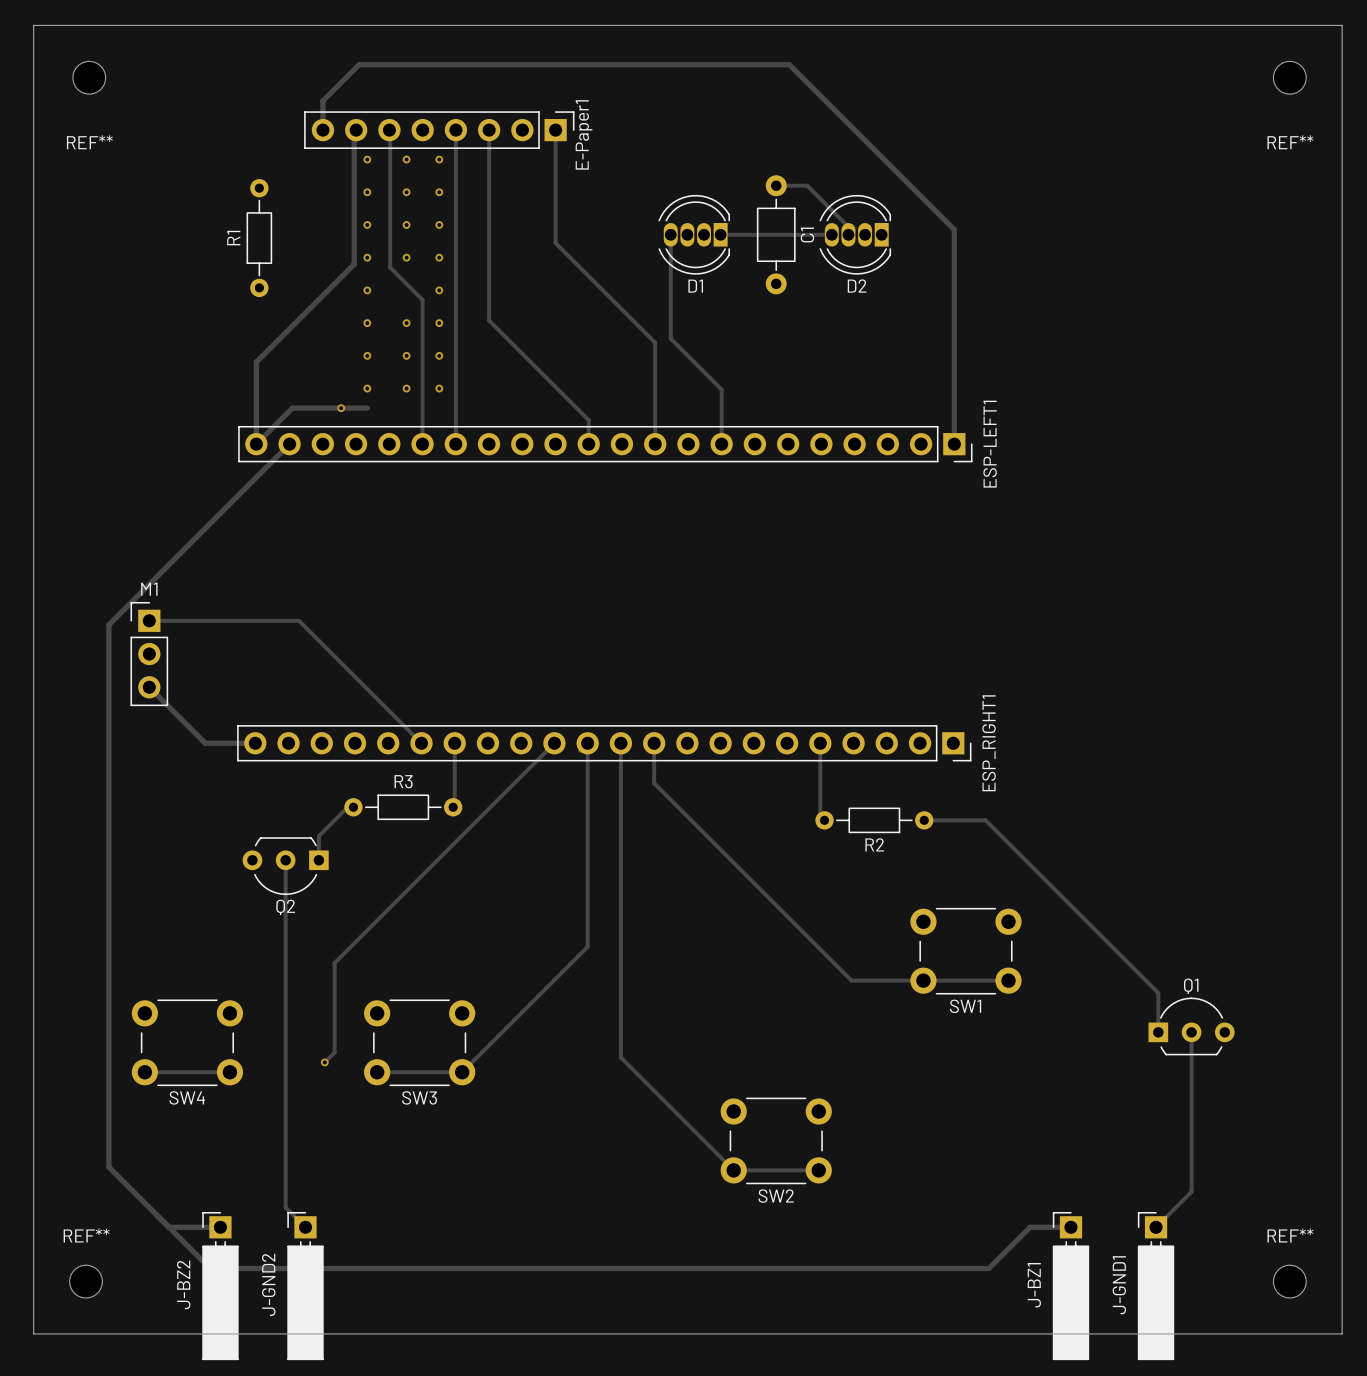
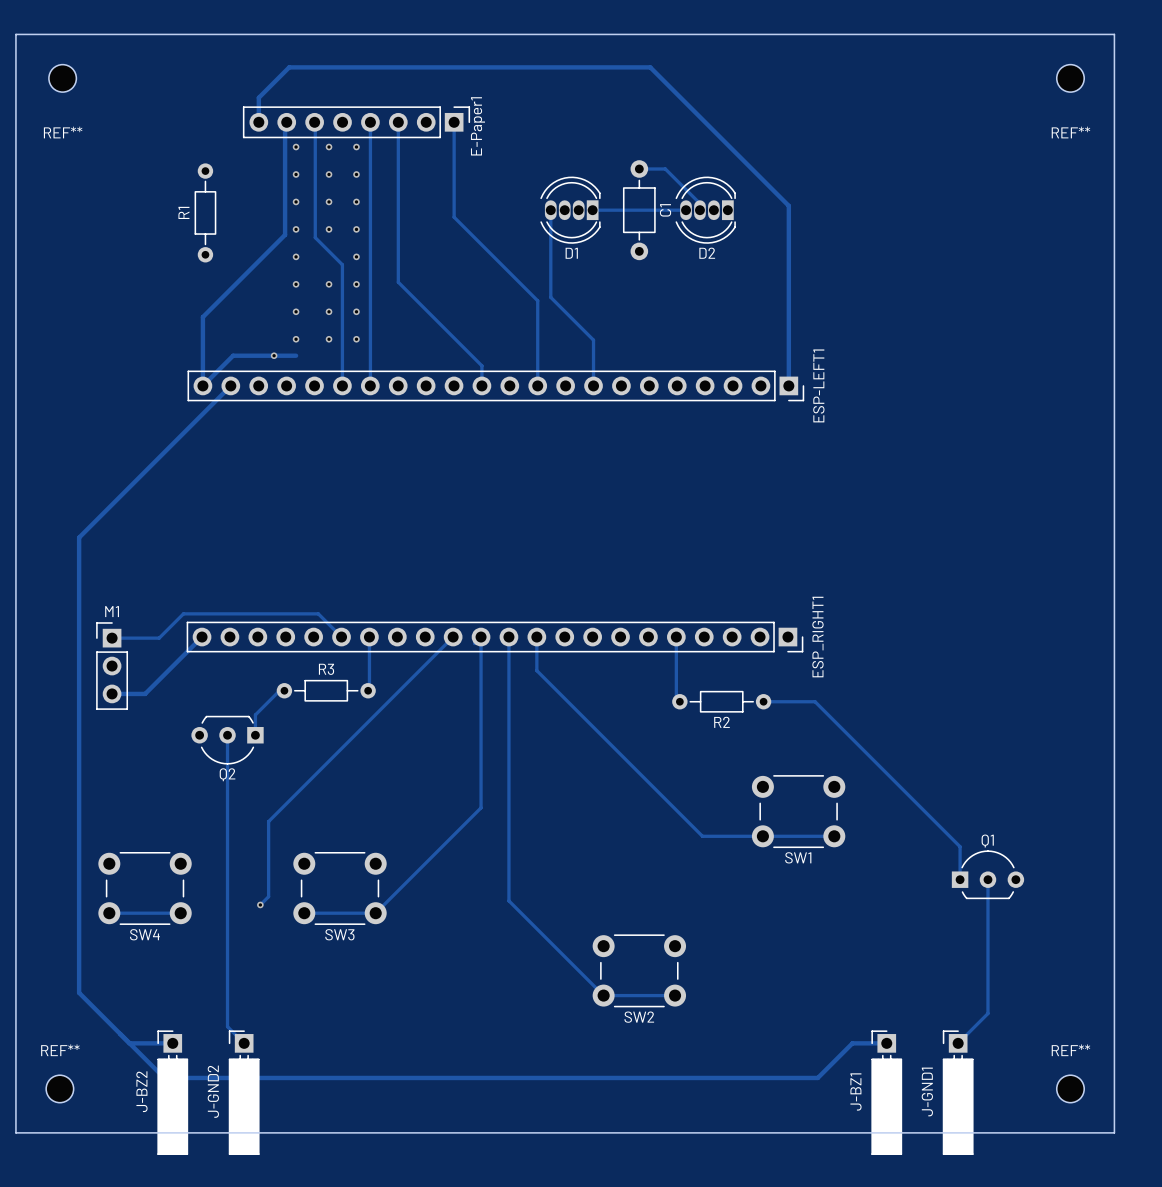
track: (149, 620) (299, 620) (393, 715) -> (112, 638) (159, 638) (183, 613) (318, 613)
M1 position: (149, 654) -> (112, 666)
track: (149, 687) (205, 743) (255, 743) -> (112, 693) (145, 693) (202, 637)

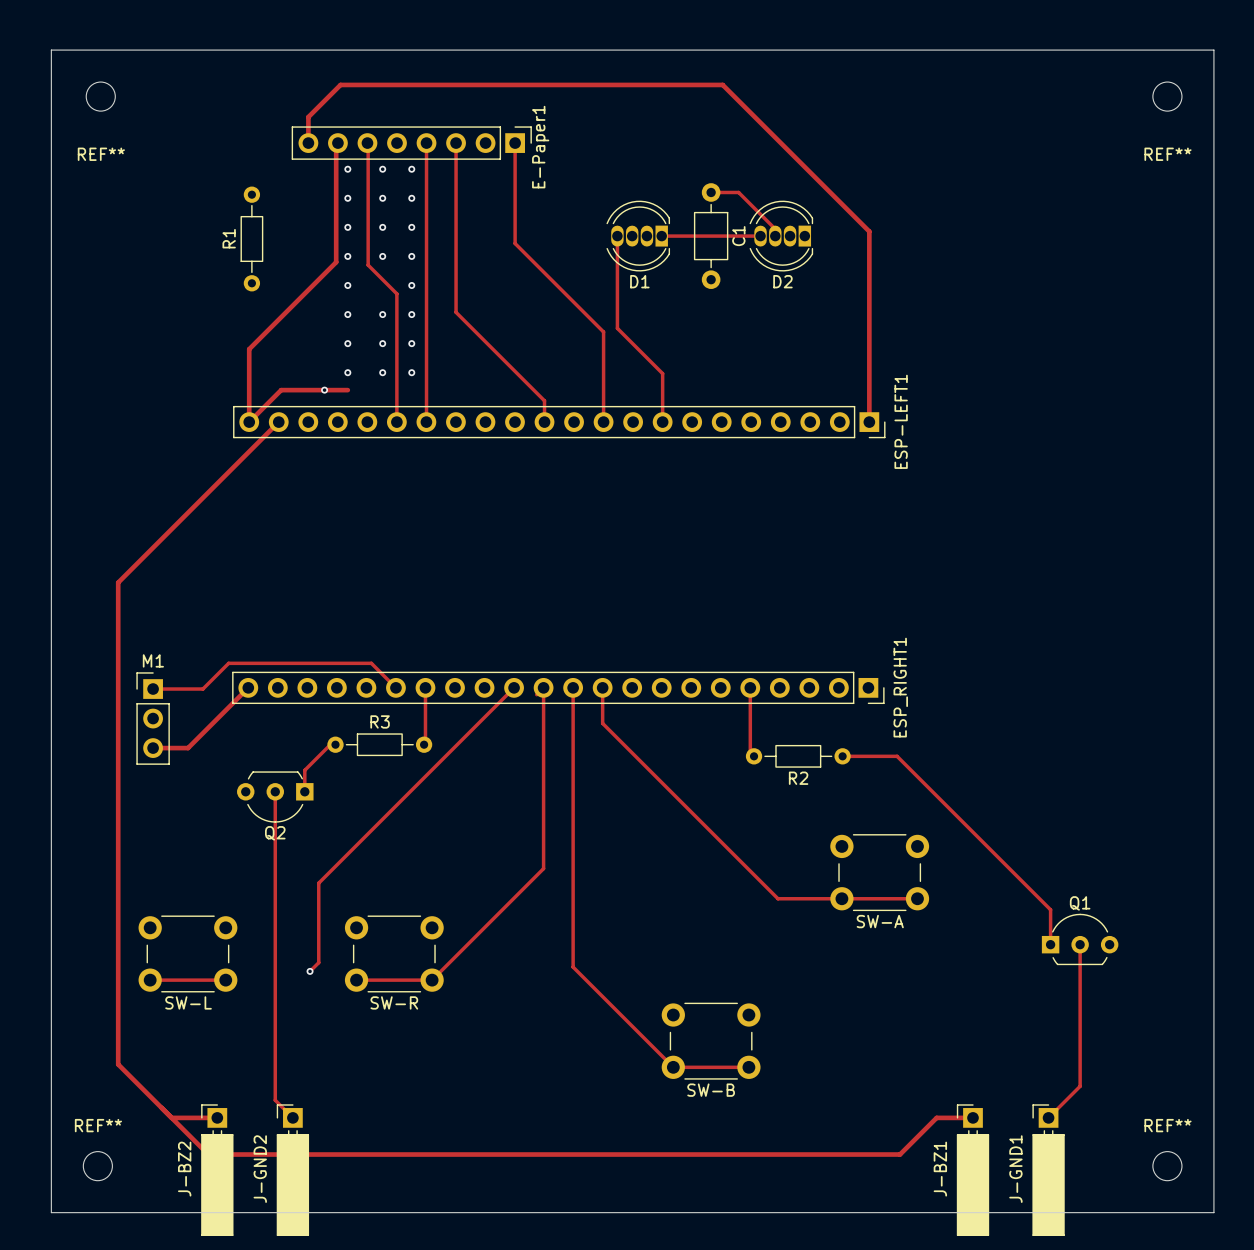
SW1 name: SW1 (798, 857) -> SW-A (880, 921)
SW4 name: SW4 (144, 934) -> SW-L (188, 1002)
SW3 name: SW3 (339, 934) -> SW-R (394, 1002)
SW2 name: SW2 (639, 1017) -> SW-B (711, 1090)

